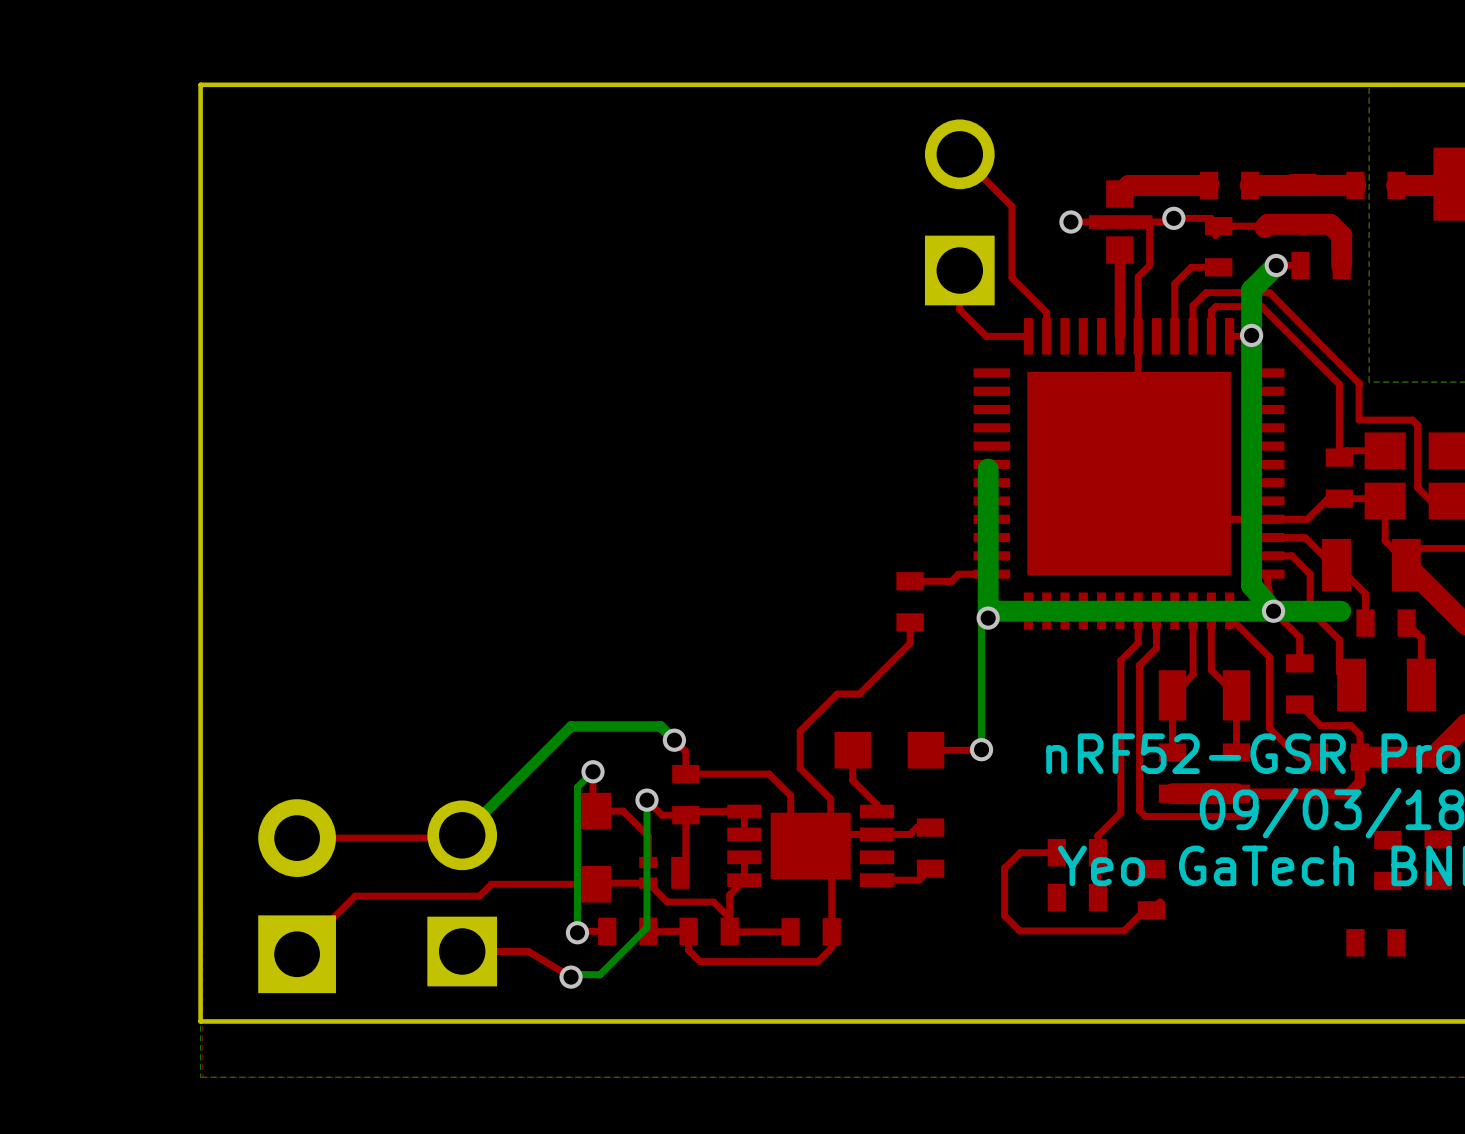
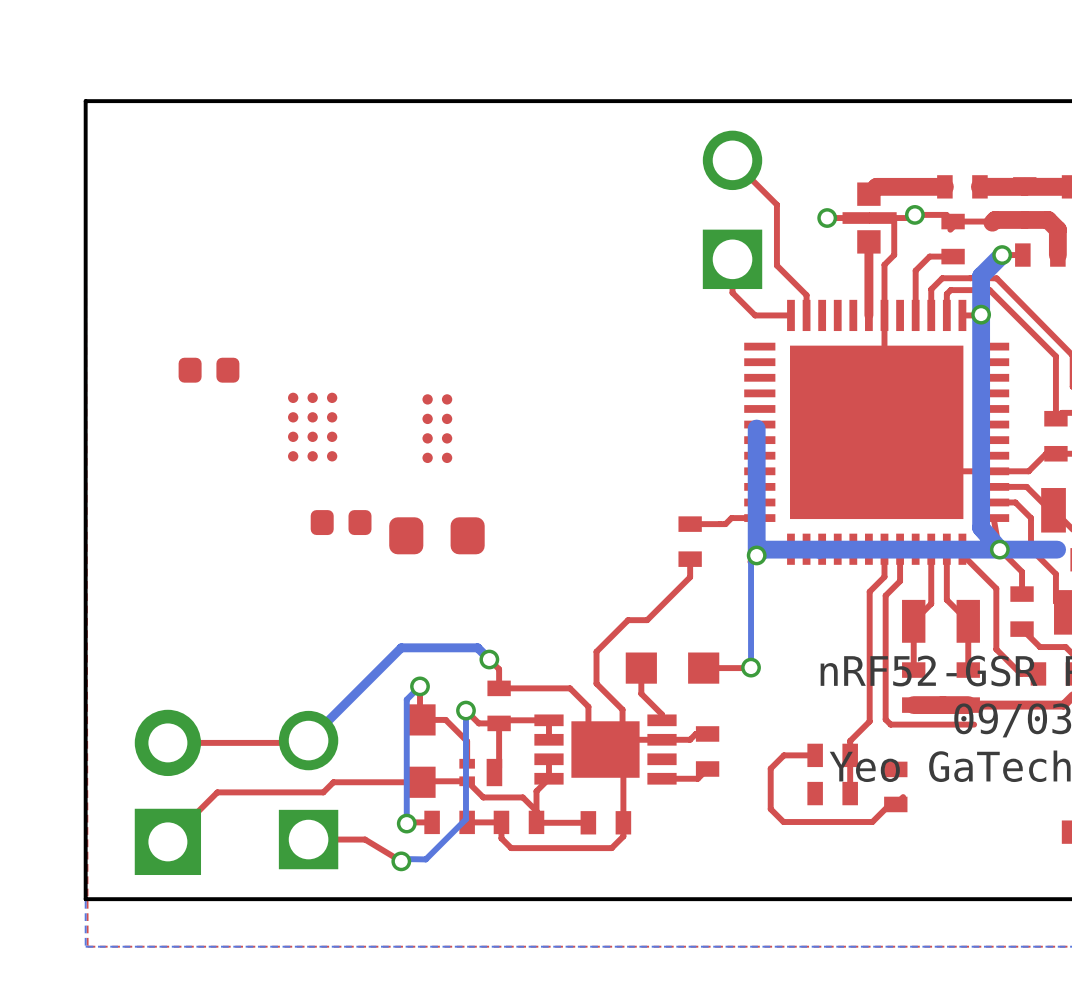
part: none -> (209, 370)
part: none -> (312, 427)
part: none -> (437, 428)
part: none -> (341, 522)
part: none -> (436, 535)

